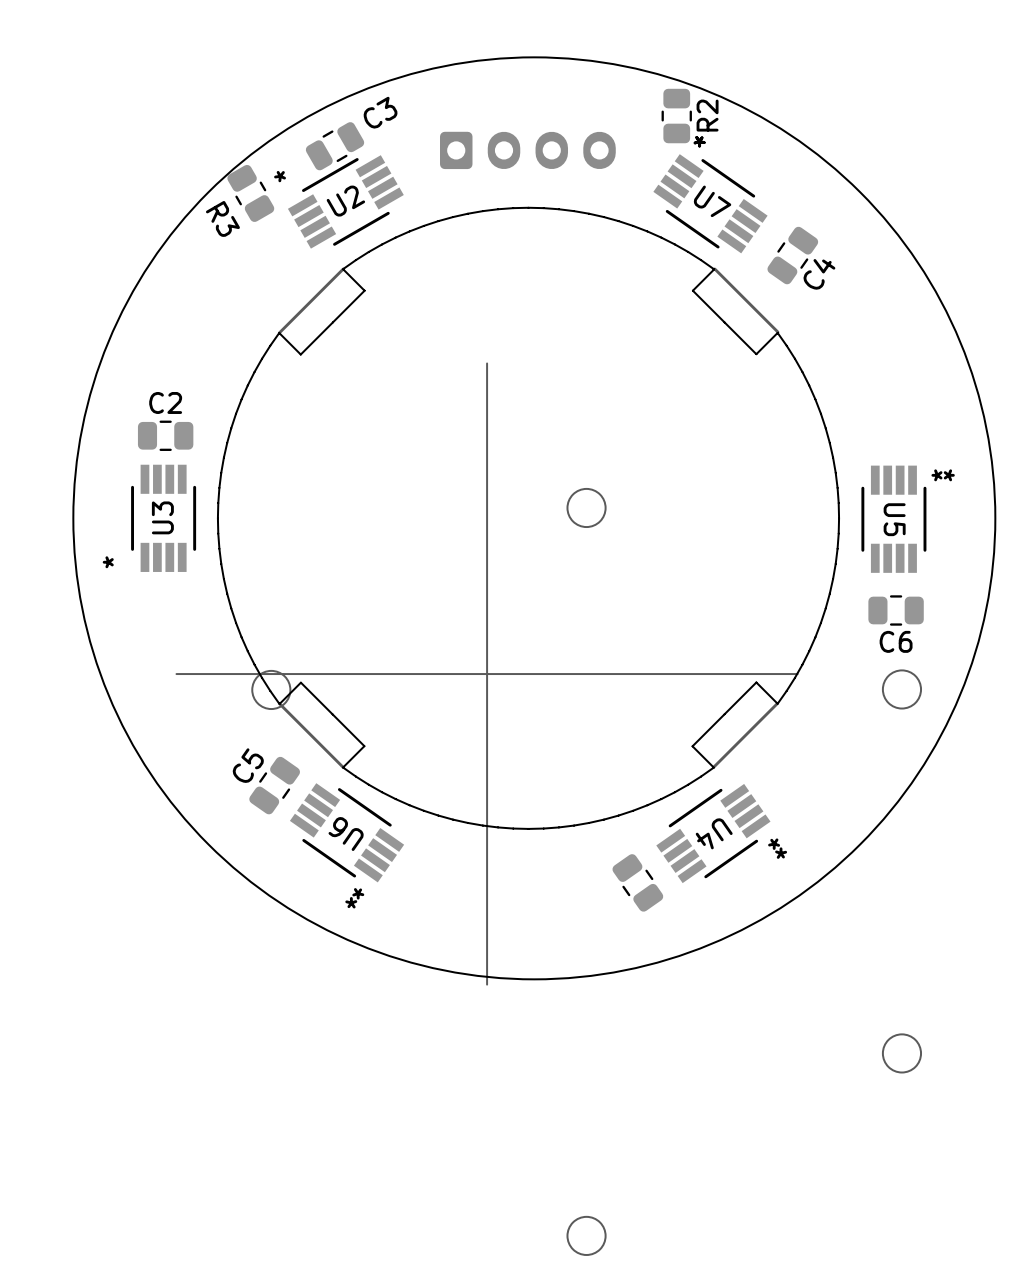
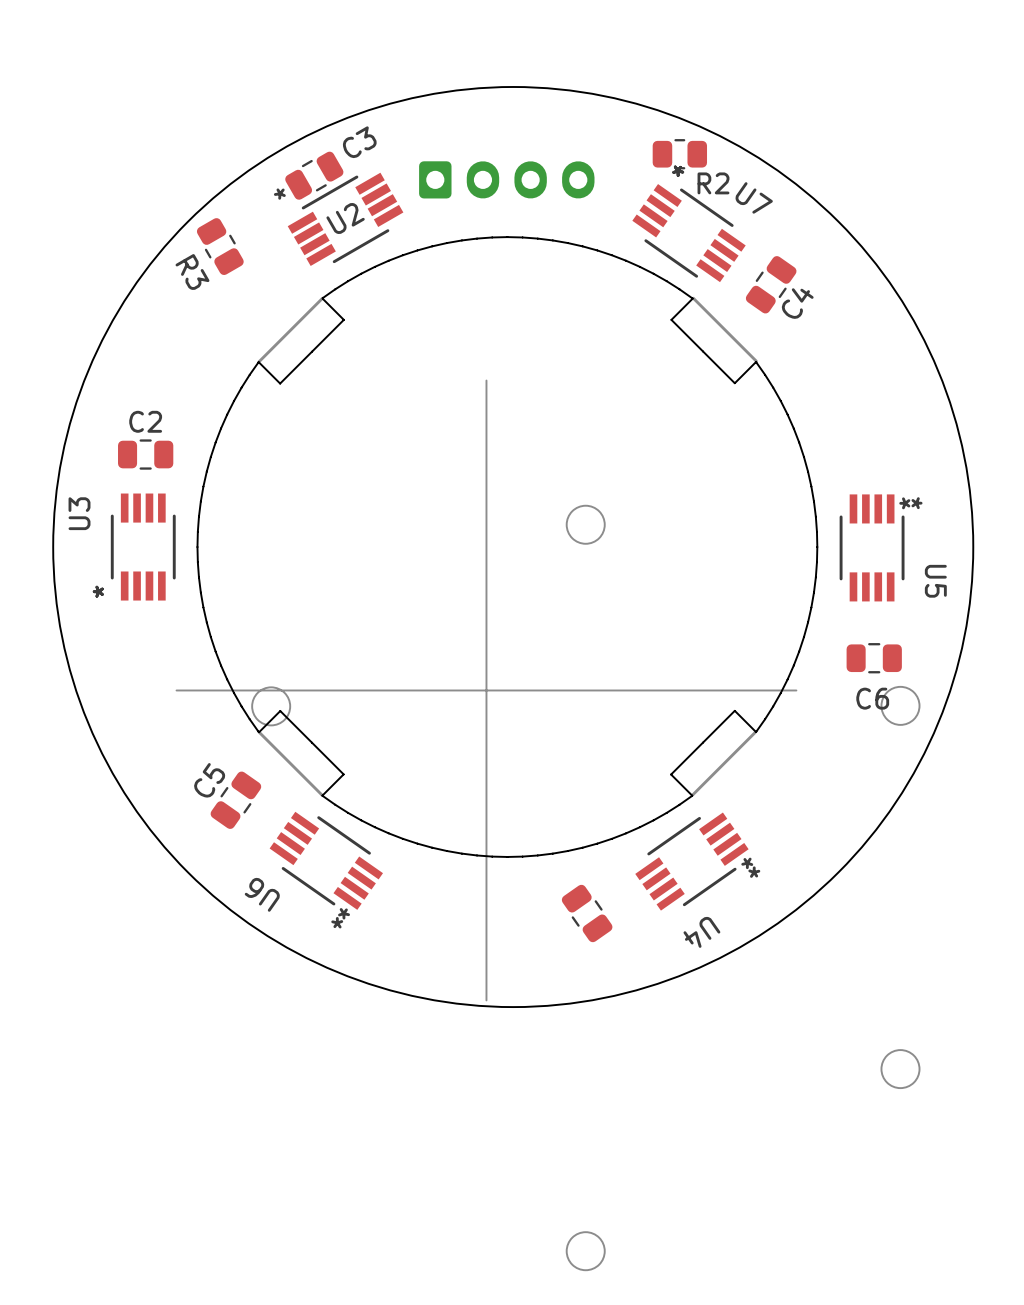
R2 rotation: 0° (676, 116) -> 90° clockwise (679, 154)
C3 position: (335, 146) -> (314, 175)
part position: (527, 150) -> (506, 179)
U7 footprint: [653, 154, 768, 254] -> [632, 184, 746, 283]
R3 position: (250, 193) -> (220, 246)
U7 name position: U7 (712, 201) -> U7 (754, 197)
C4 position: (792, 255) -> (771, 284)
line: (343, 269) (279, 332) -> (322, 298) (258, 361)
board edge: (343, 269) (368, 251) (395, 237) (453, 217) (513, 208) (574, 211) (603, 217) (647, 231) (674, 244) (713, 268) (692, 290) (756, 354) (777, 333) (809, 385) (829, 442) (838, 503) (835, 563) (825, 608) (815, 637) (802, 664) (777, 703) (756, 682) (692, 746) (713, 767) -> (322, 298) (348, 281) (374, 266) (432, 246) (492, 237) (552, 240) (582, 246) (626, 260) (653, 273) (692, 298) (671, 319) (734, 383) (756, 362) (787, 414) (808, 471) (816, 531) (813, 592) (803, 637) (793, 665) (780, 693) (756, 731) (734, 710) (671, 774) (692, 795)
board edge: (343, 269) (364, 290) (300, 354) (279, 333) (254, 371) (241, 399) (231, 428) (221, 472) (218, 533) (227, 593) (247, 651) (279, 703) (300, 682) (364, 746) (343, 767) (368, 784) (409, 805) (438, 815) (482, 825) (543, 828) (603, 819) (661, 799) (713, 767) -> none
line: (714, 269) (777, 332) -> (693, 298) (756, 361)
board edge: none -> (322, 298) (343, 319)
board edge: none -> (343, 319) (280, 383) (258, 362) (227, 414) (215, 442) (203, 486) (197, 547) (198, 577) (206, 622) (227, 679) (241, 706) (259, 732)
C2 position: (165, 435) -> (145, 454)
U3 footprint: [131, 464, 197, 572] -> [110, 493, 176, 601]
U5 footprint: [861, 465, 927, 573] -> [839, 494, 905, 602]
U3 name position: U3 (162, 517) -> U3 (79, 513)
round board edge position: (534, 518) -> (513, 547)
U5 name position: U5 (894, 519) -> U5 (935, 581)
C6 position: (896, 610) -> (874, 658)
C6 name position: C6 (896, 641) -> C6 (872, 698)
line: (279, 703) (343, 767) -> (259, 732) (322, 795)
line: (776, 703) (714, 766) -> (755, 732) (692, 794)
board edge: none -> (259, 732) (280, 711) (343, 774) (322, 795) (361, 820) (388, 833) (417, 843) (461, 853) (522, 856) (582, 847) (639, 827) (692, 795)
U6 footprint: [289, 783, 405, 883] -> [269, 811, 383, 910]
U4 footprint: [656, 783, 771, 884] -> [635, 812, 749, 911]
C5 position: (274, 785) -> (235, 800)
U4 name position: U4 (714, 833) -> U4 (701, 932)
U6 name position: U6 (346, 834) -> U6 (262, 894)
part position: (637, 882) -> (587, 913)

